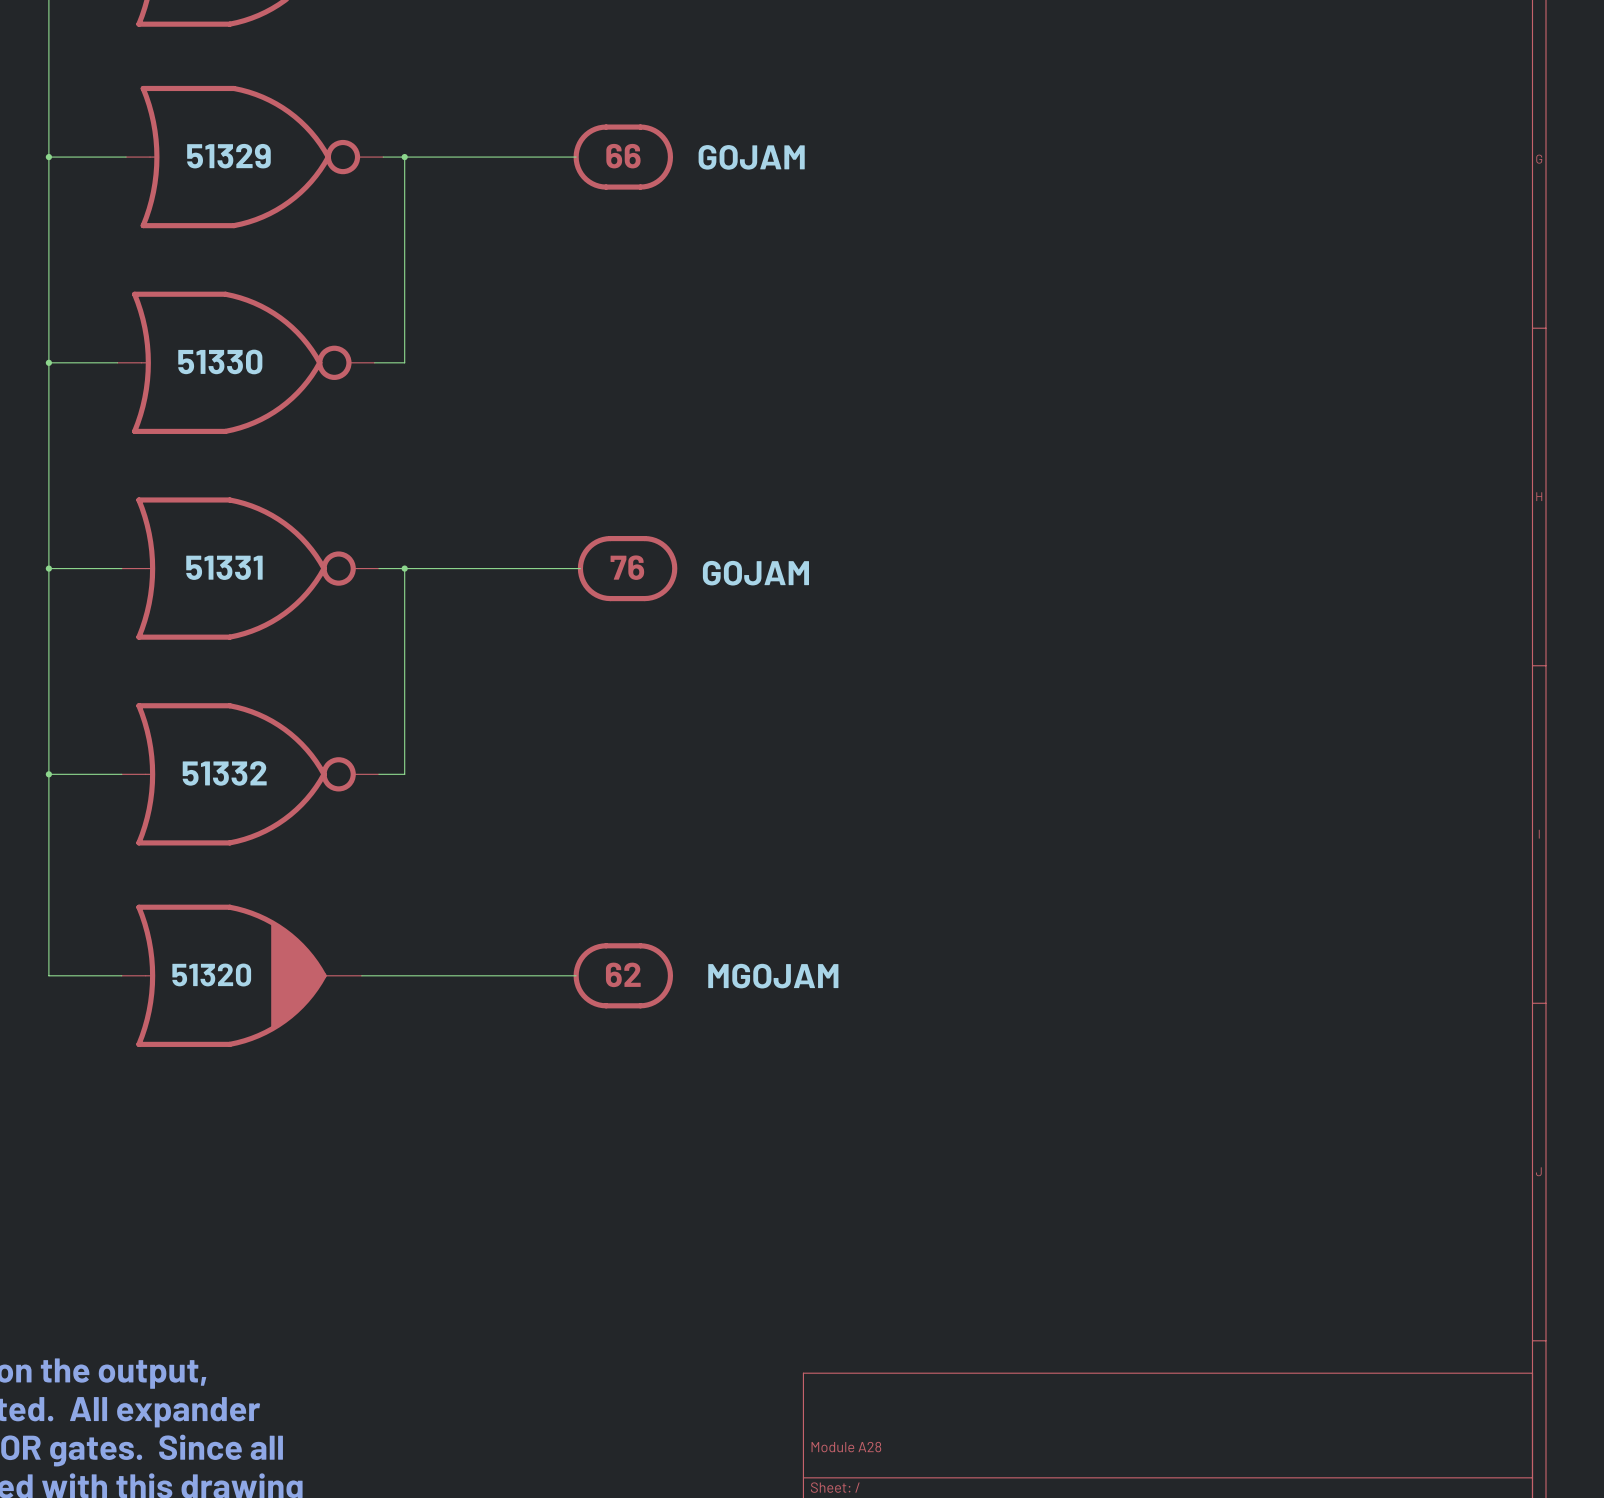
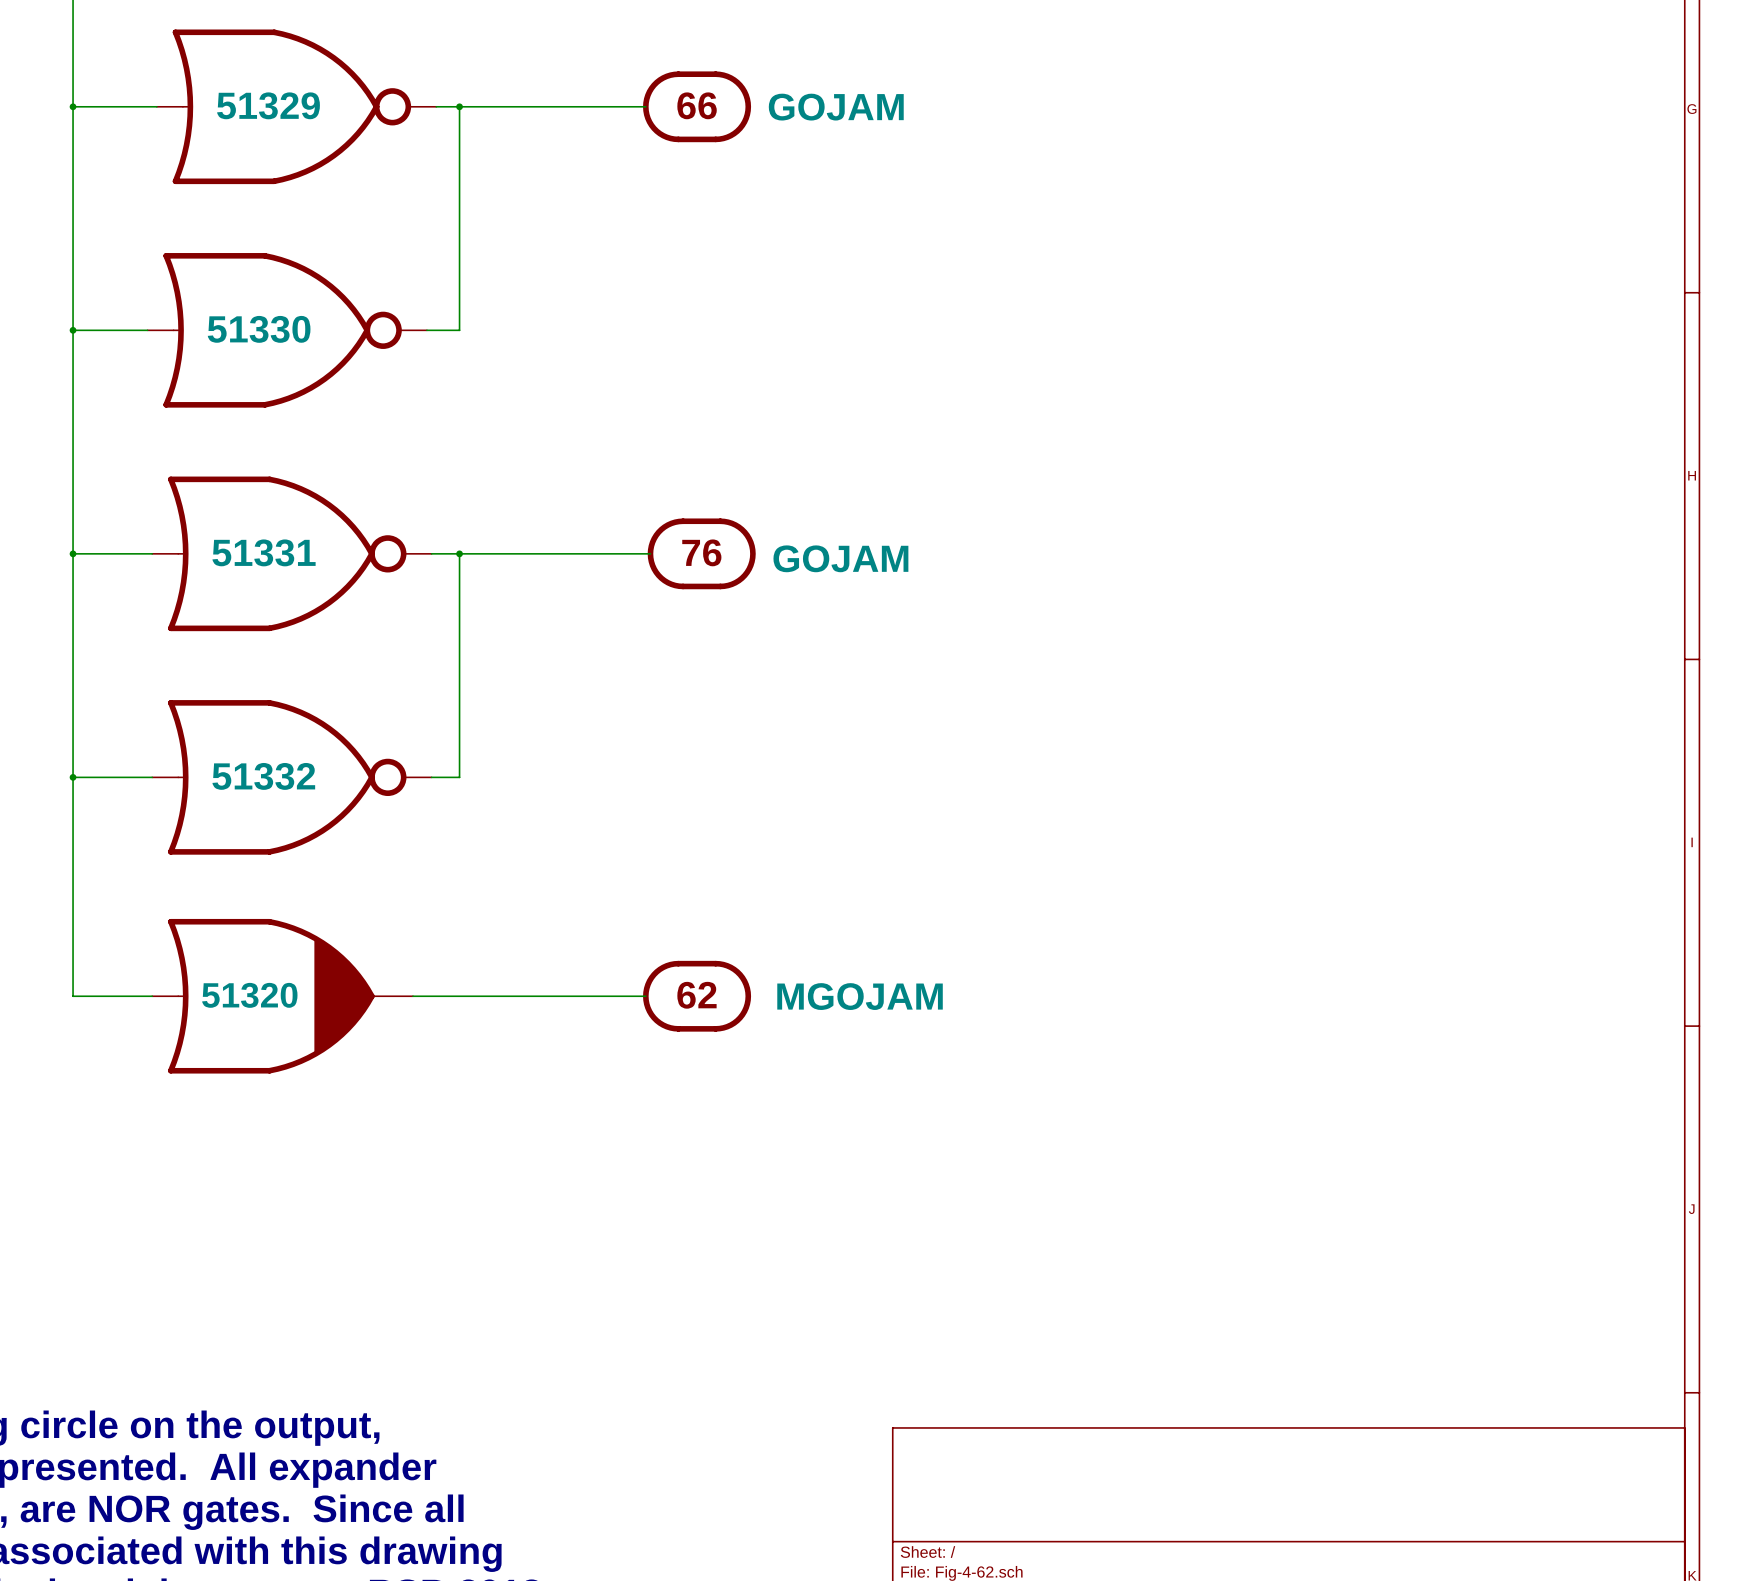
title block: Module A28 (846, 1447) -> none

